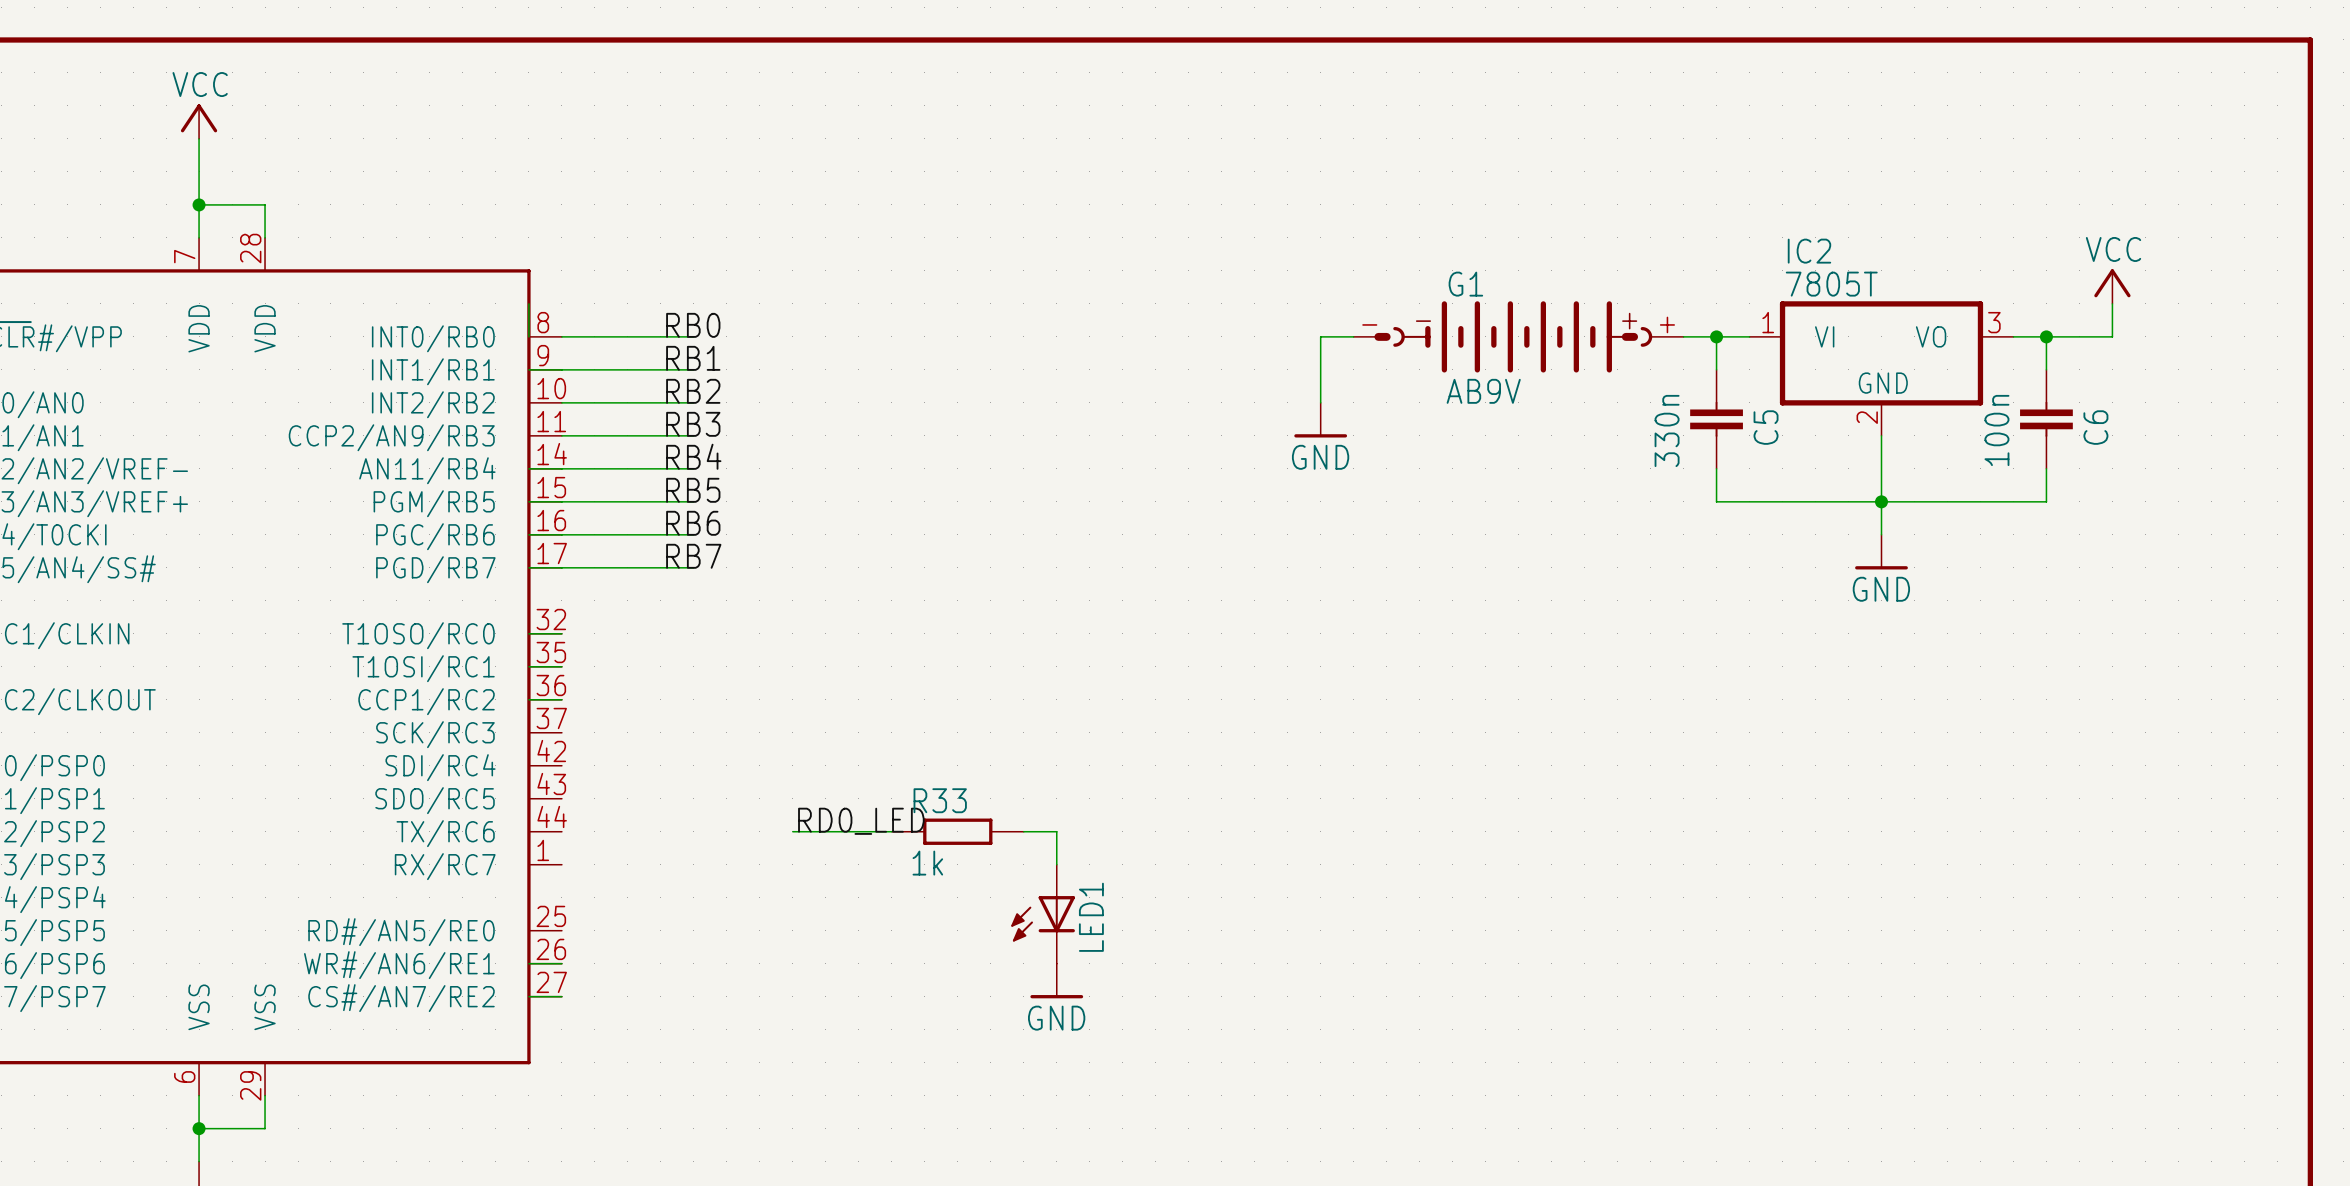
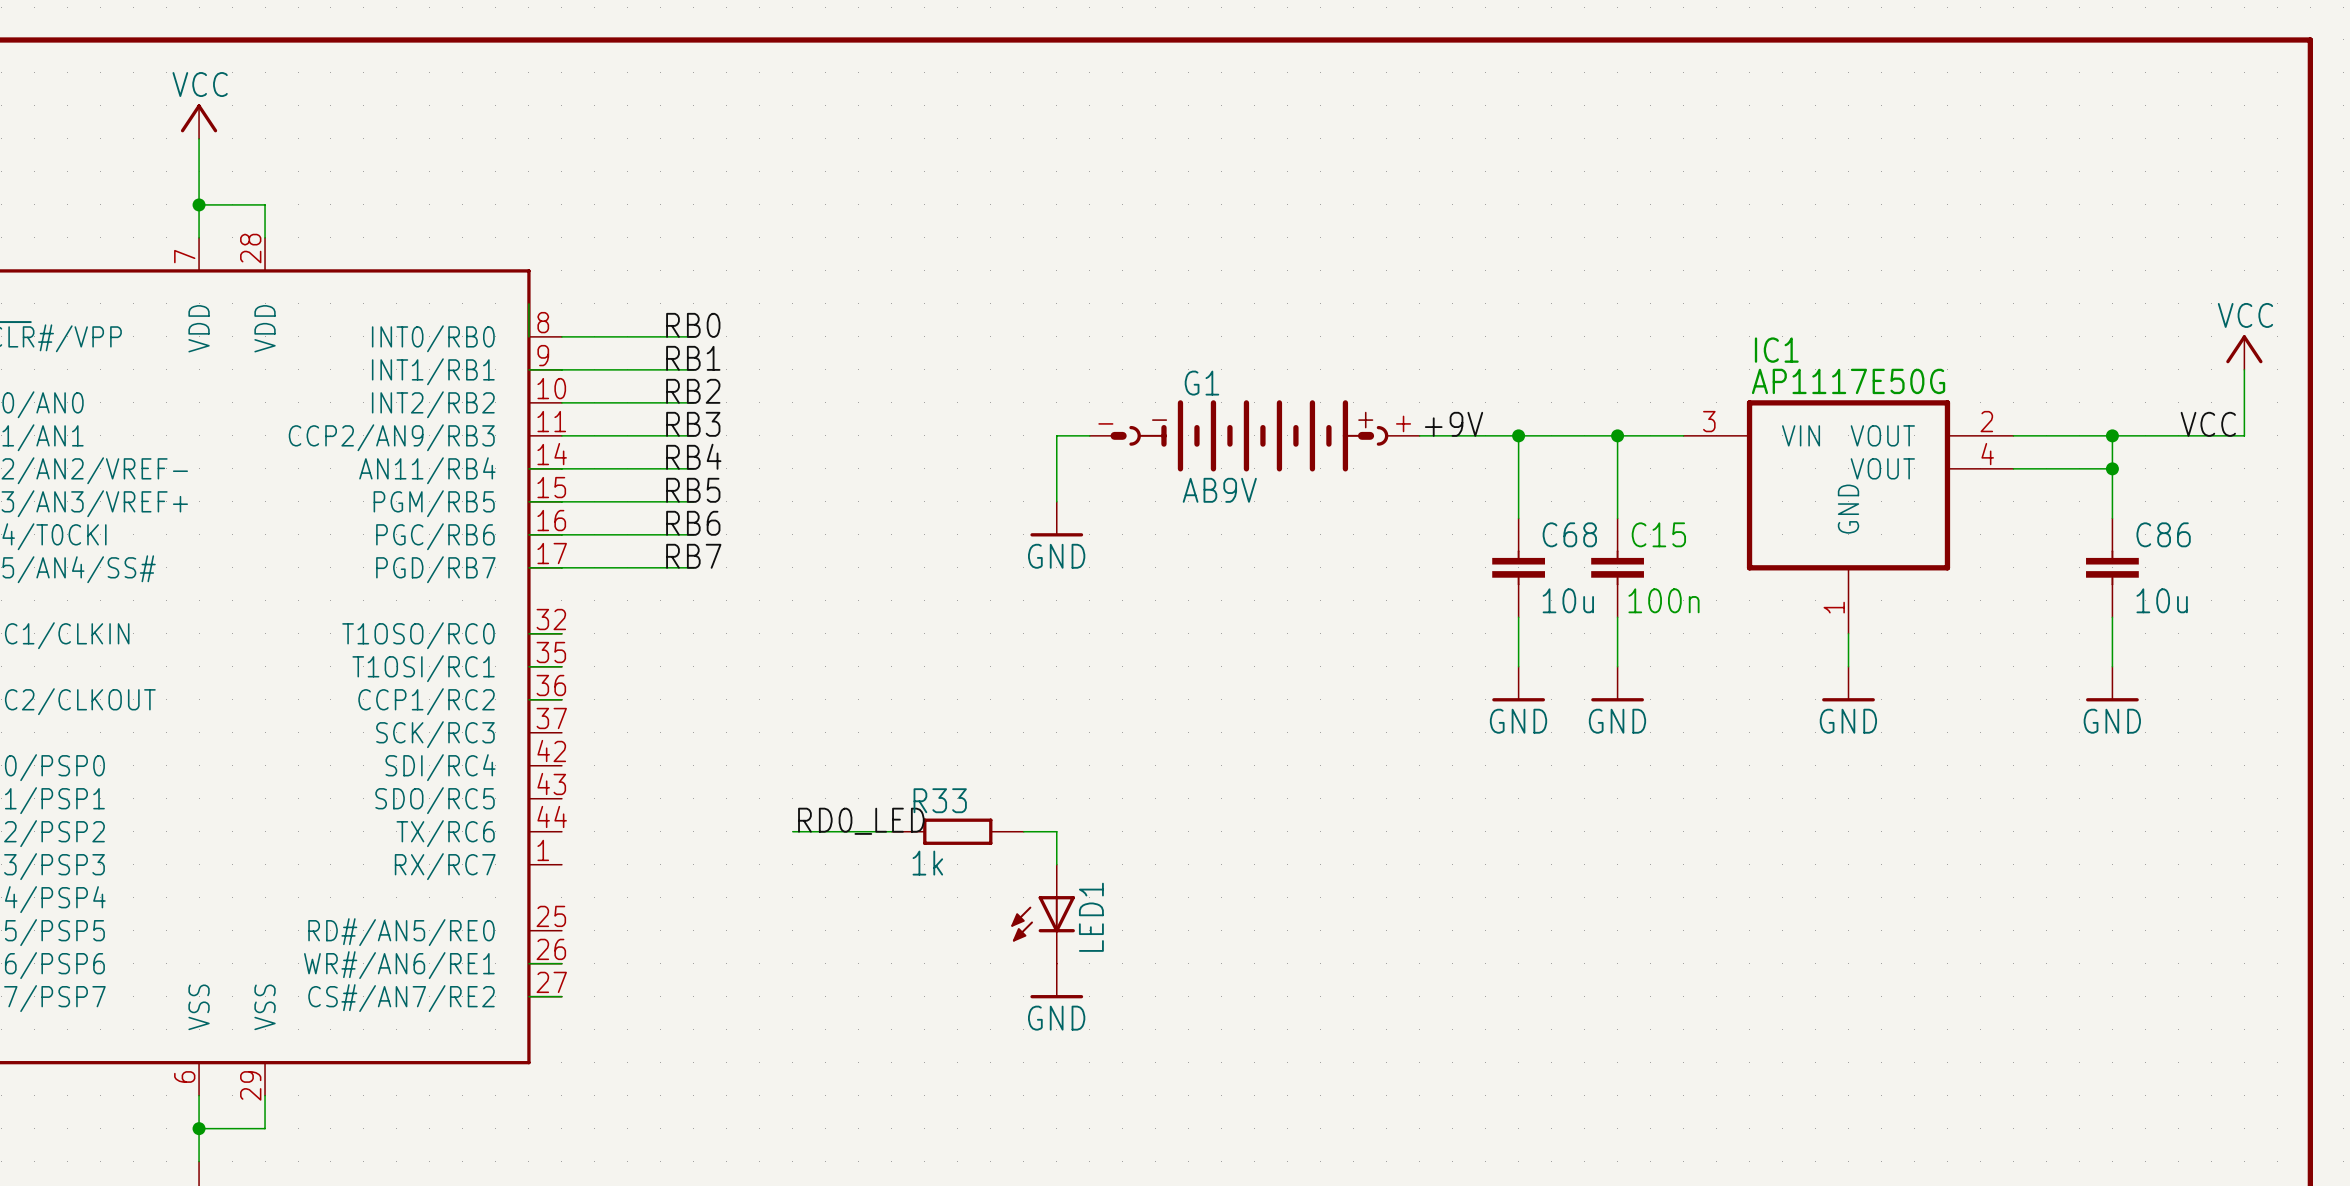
power symbol position: VCC (2112, 286) -> VCC (2244, 352)
wire: (2112, 303) (2112, 336) (2013, 336) -> none
wire: (1353, 336) (1320, 336) (1320, 402) -> (1089, 435) (1056, 435) (1056, 501)
G1 position: (1518, 336) -> (1254, 435)
wire: (1683, 336) (1749, 336) -> none
wire: (1716, 336) (1716, 369) -> none
junction: (1716, 336) -> none
wire: (2046, 336) (2046, 369) -> none
junction: (2046, 336) -> none
IC2: 7805T (1881, 368) -> none
wire: none -> (2244, 369) (2244, 435) (2013, 435)
C5: 330n (1716, 419) -> none
C6: 100n (2046, 419) -> none
power symbol: GND (1320, 420) -> none
label: none -> +9V (1454, 424)
label: none -> VCC (2208, 424)
wire: none -> (1419, 435) (1683, 435)
wire: none -> (1518, 435) (1518, 518)
junction: none -> (1518, 435)
wire: none -> (1617, 435) (1617, 518)
junction: none -> (1617, 435)
wire: (1881, 435) (1881, 534) -> none
wire: none -> (2112, 435) (2112, 518)
junction: none -> (2112, 435)
wire: (1716, 468) (1716, 501) (2046, 501) (2046, 468) -> none
wire: none -> (2013, 468) (2112, 468)
junction: none -> (2112, 468)
junction: (1881, 501) -> none
IC1: none -> AP1117E50G (1848, 517)
power symbol: none -> GND (1056, 519)
power symbol: GND (1881, 552) -> none
C68: none -> 10u (1518, 567)
C15: none -> 100n (1617, 567)
C86: none -> 10u (2112, 567)
wire: none -> (1518, 617) (1518, 666)
wire: none -> (1617, 617) (1617, 666)
wire: none -> (2112, 617) (2112, 666)
wire: none -> (1848, 633) (1848, 666)
power symbol: none -> GND (1518, 684)
power symbol: none -> GND (1617, 684)
power symbol: none -> GND (1848, 684)
power symbol: none -> GND (2112, 684)

